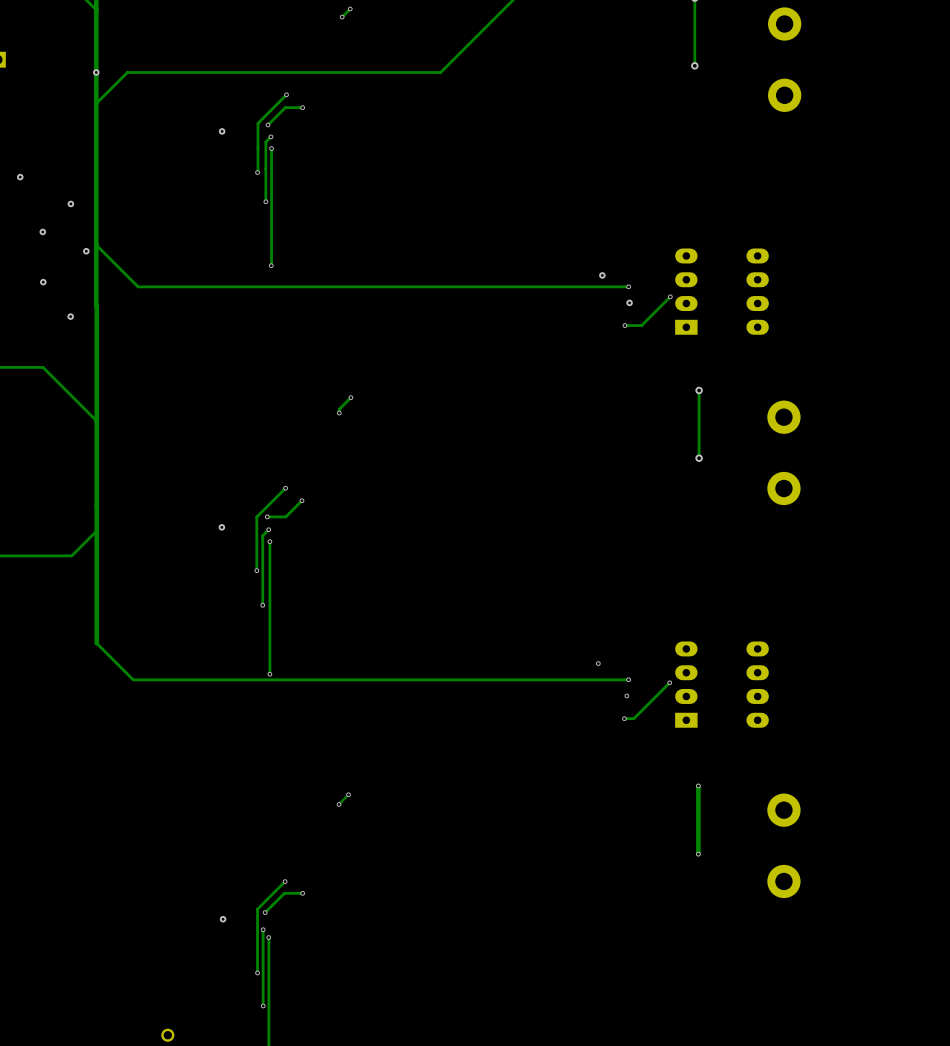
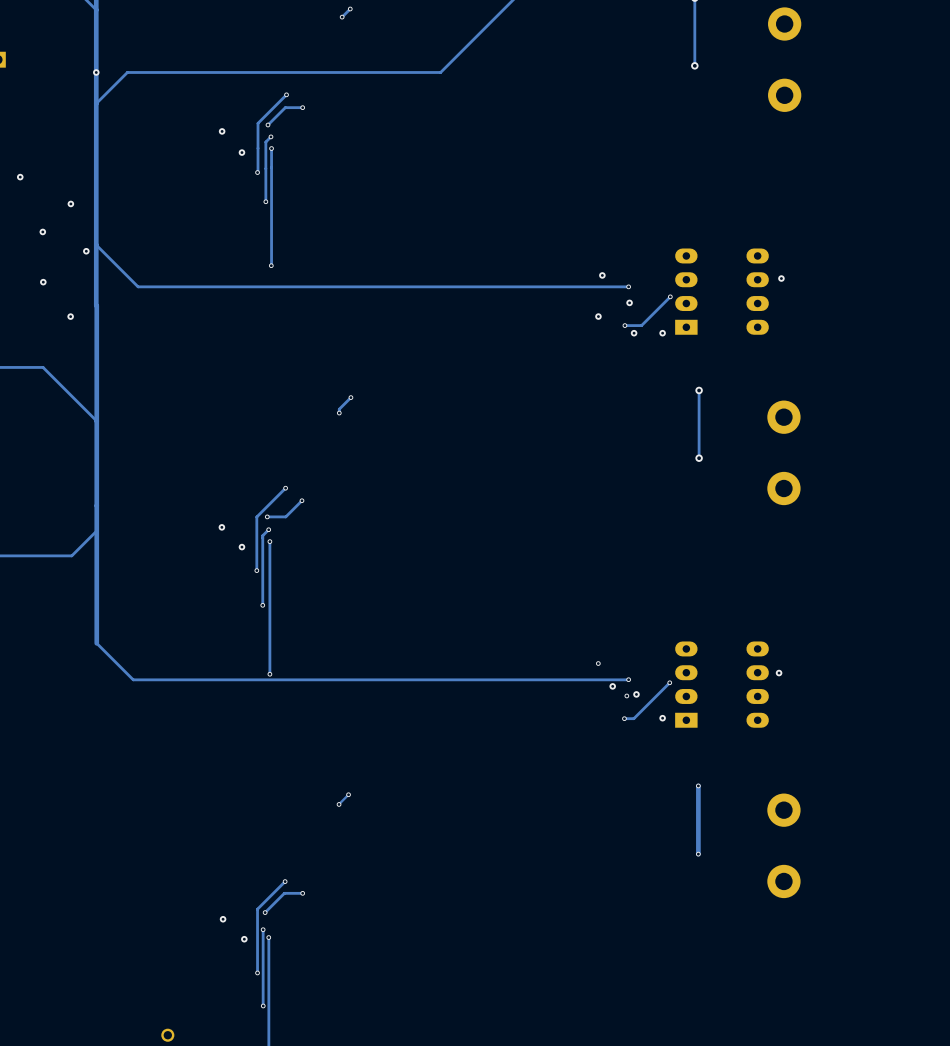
via: none -> (241, 152)
via: none -> (781, 278)
via: none -> (598, 316)
via: none -> (634, 333)
via: none -> (662, 333)
via: none -> (241, 547)
via: none -> (779, 673)
via: none -> (612, 686)
via: none -> (636, 694)
via: none -> (662, 718)
via: none -> (244, 939)

